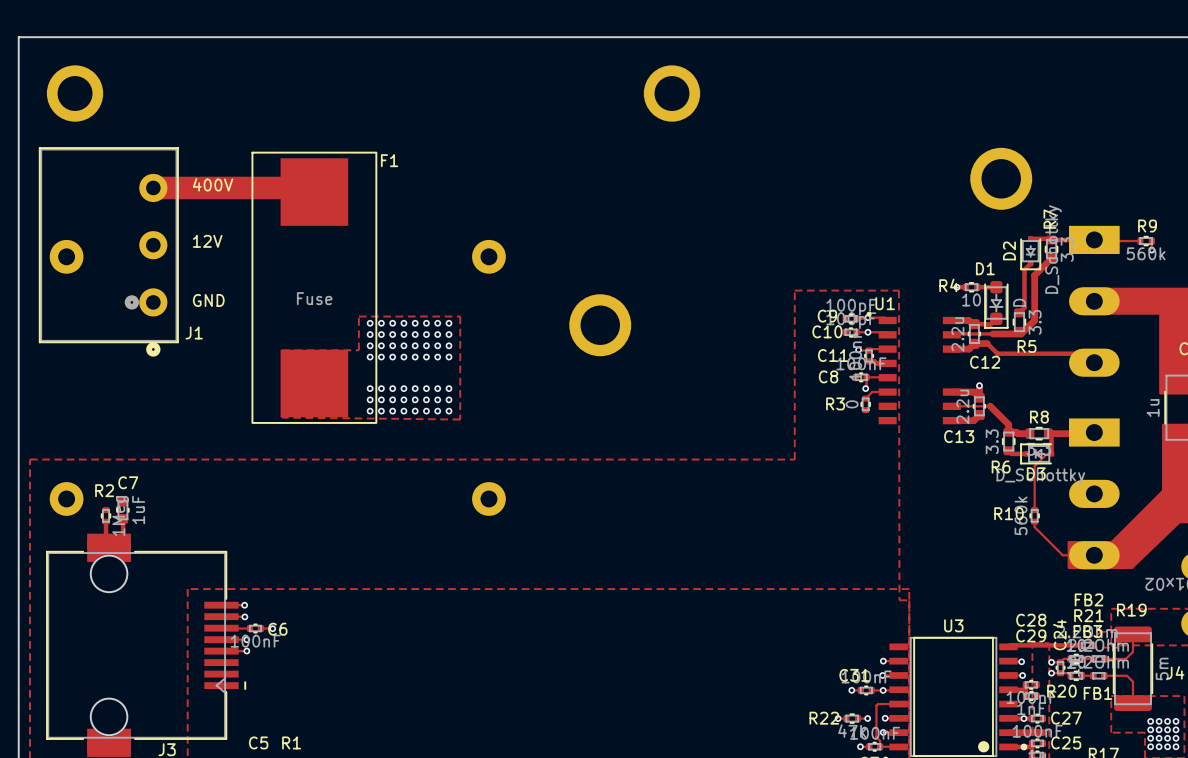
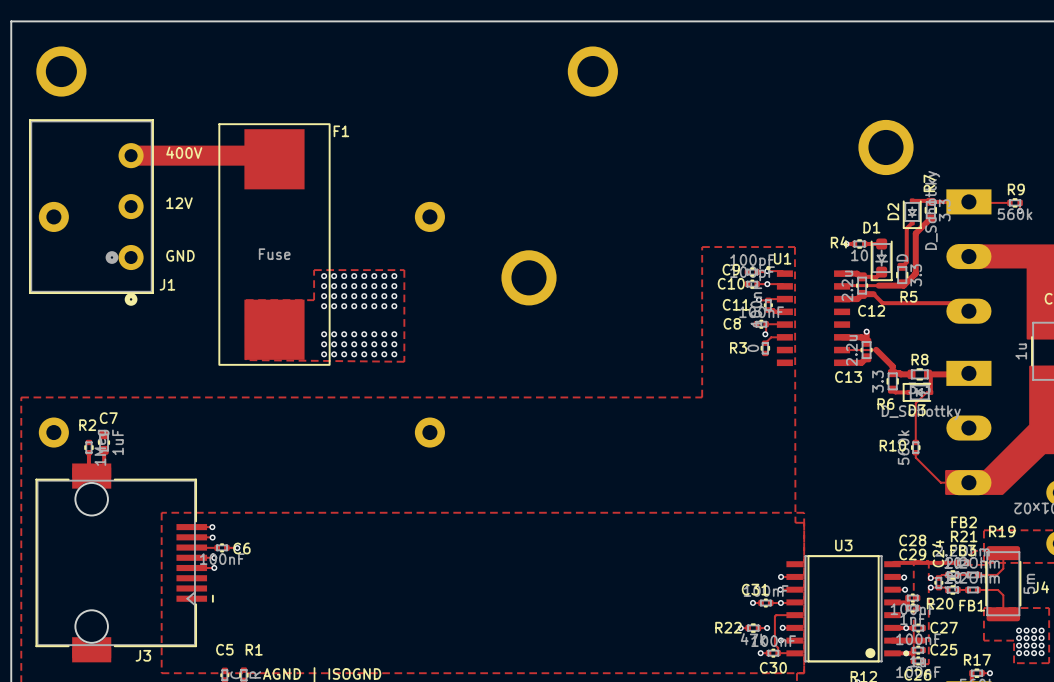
U1 footprint: [866, 311, 961, 425] -> [766, 265, 851, 367]

